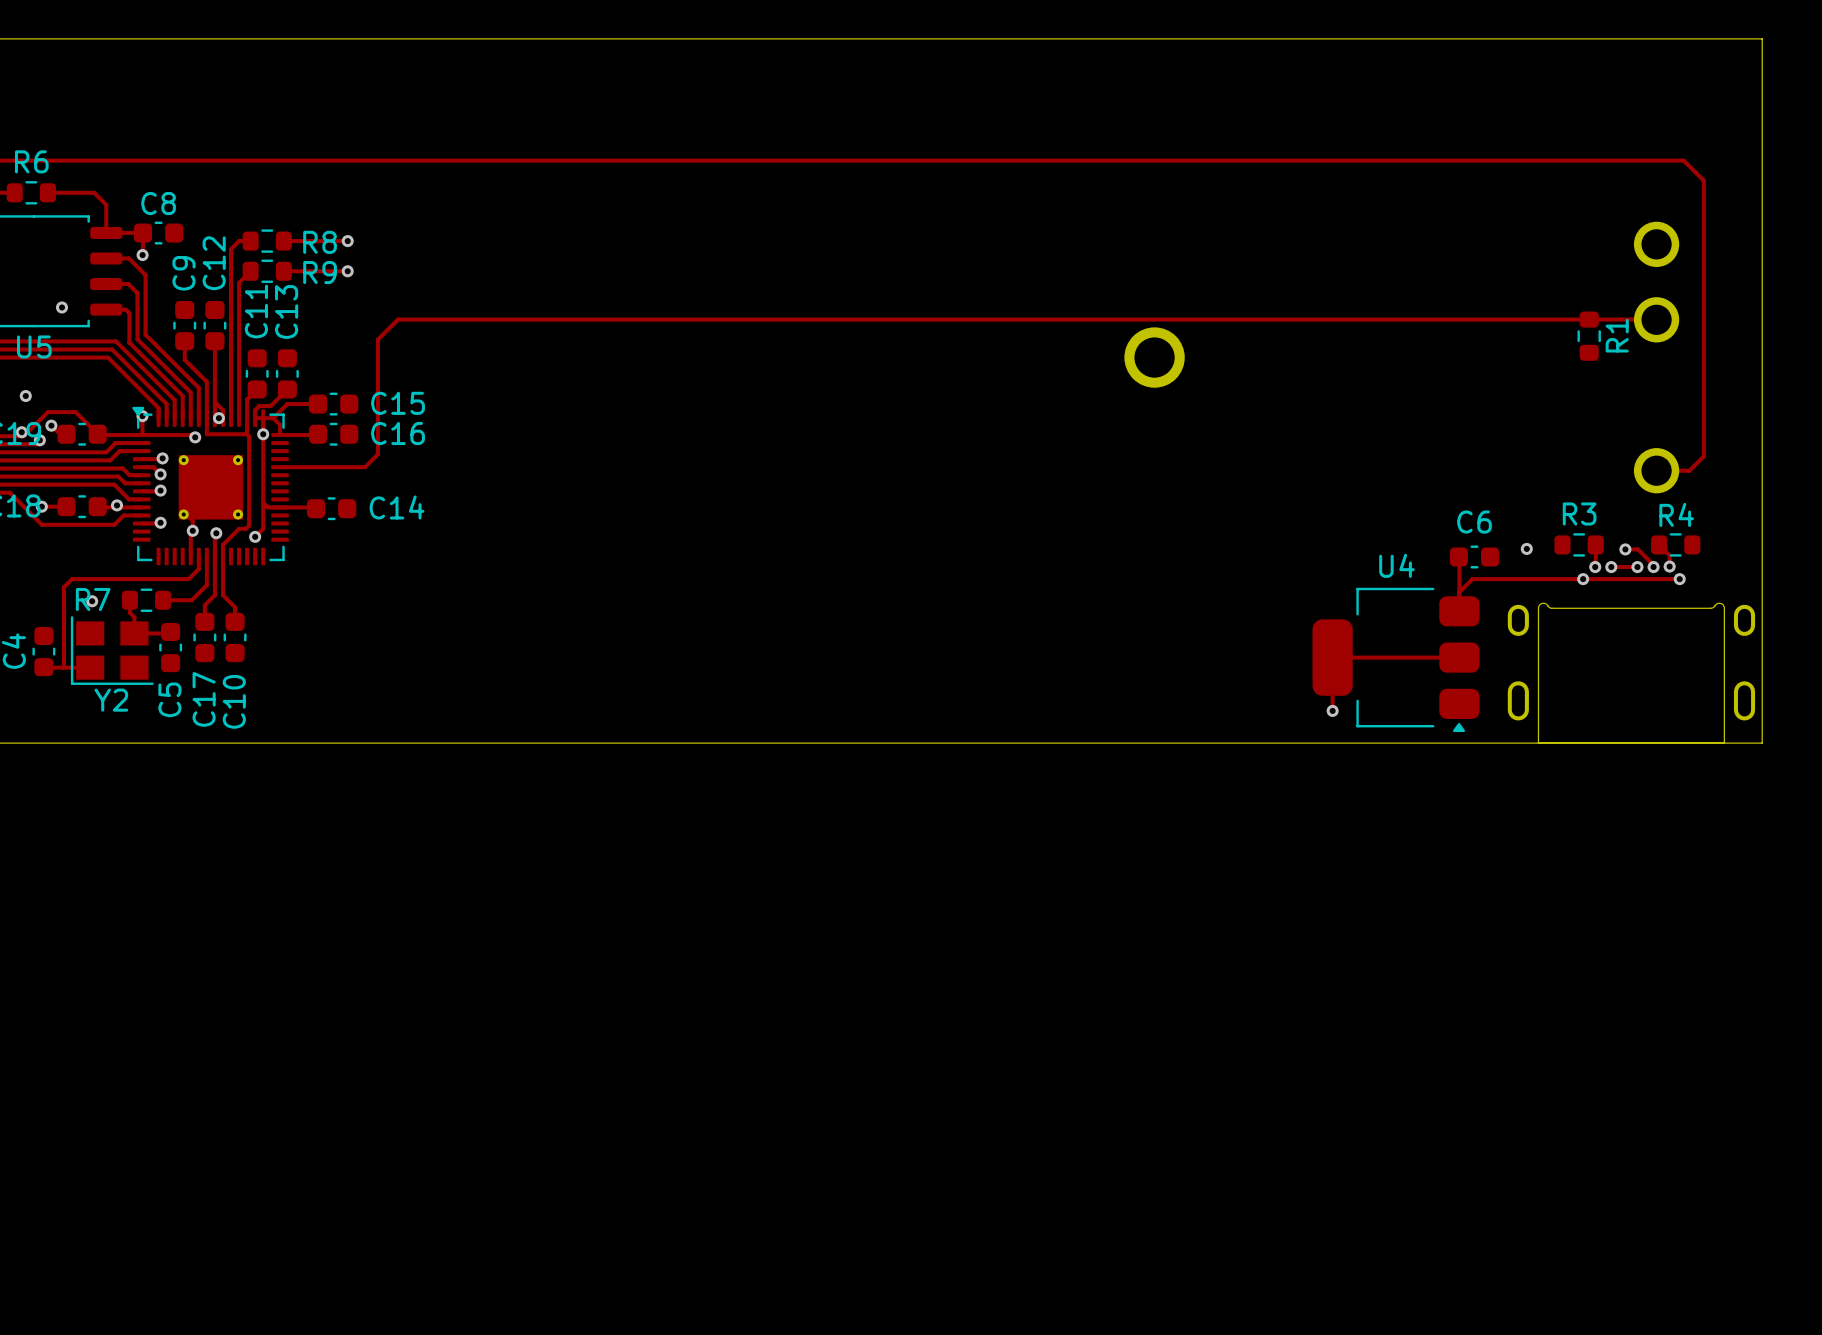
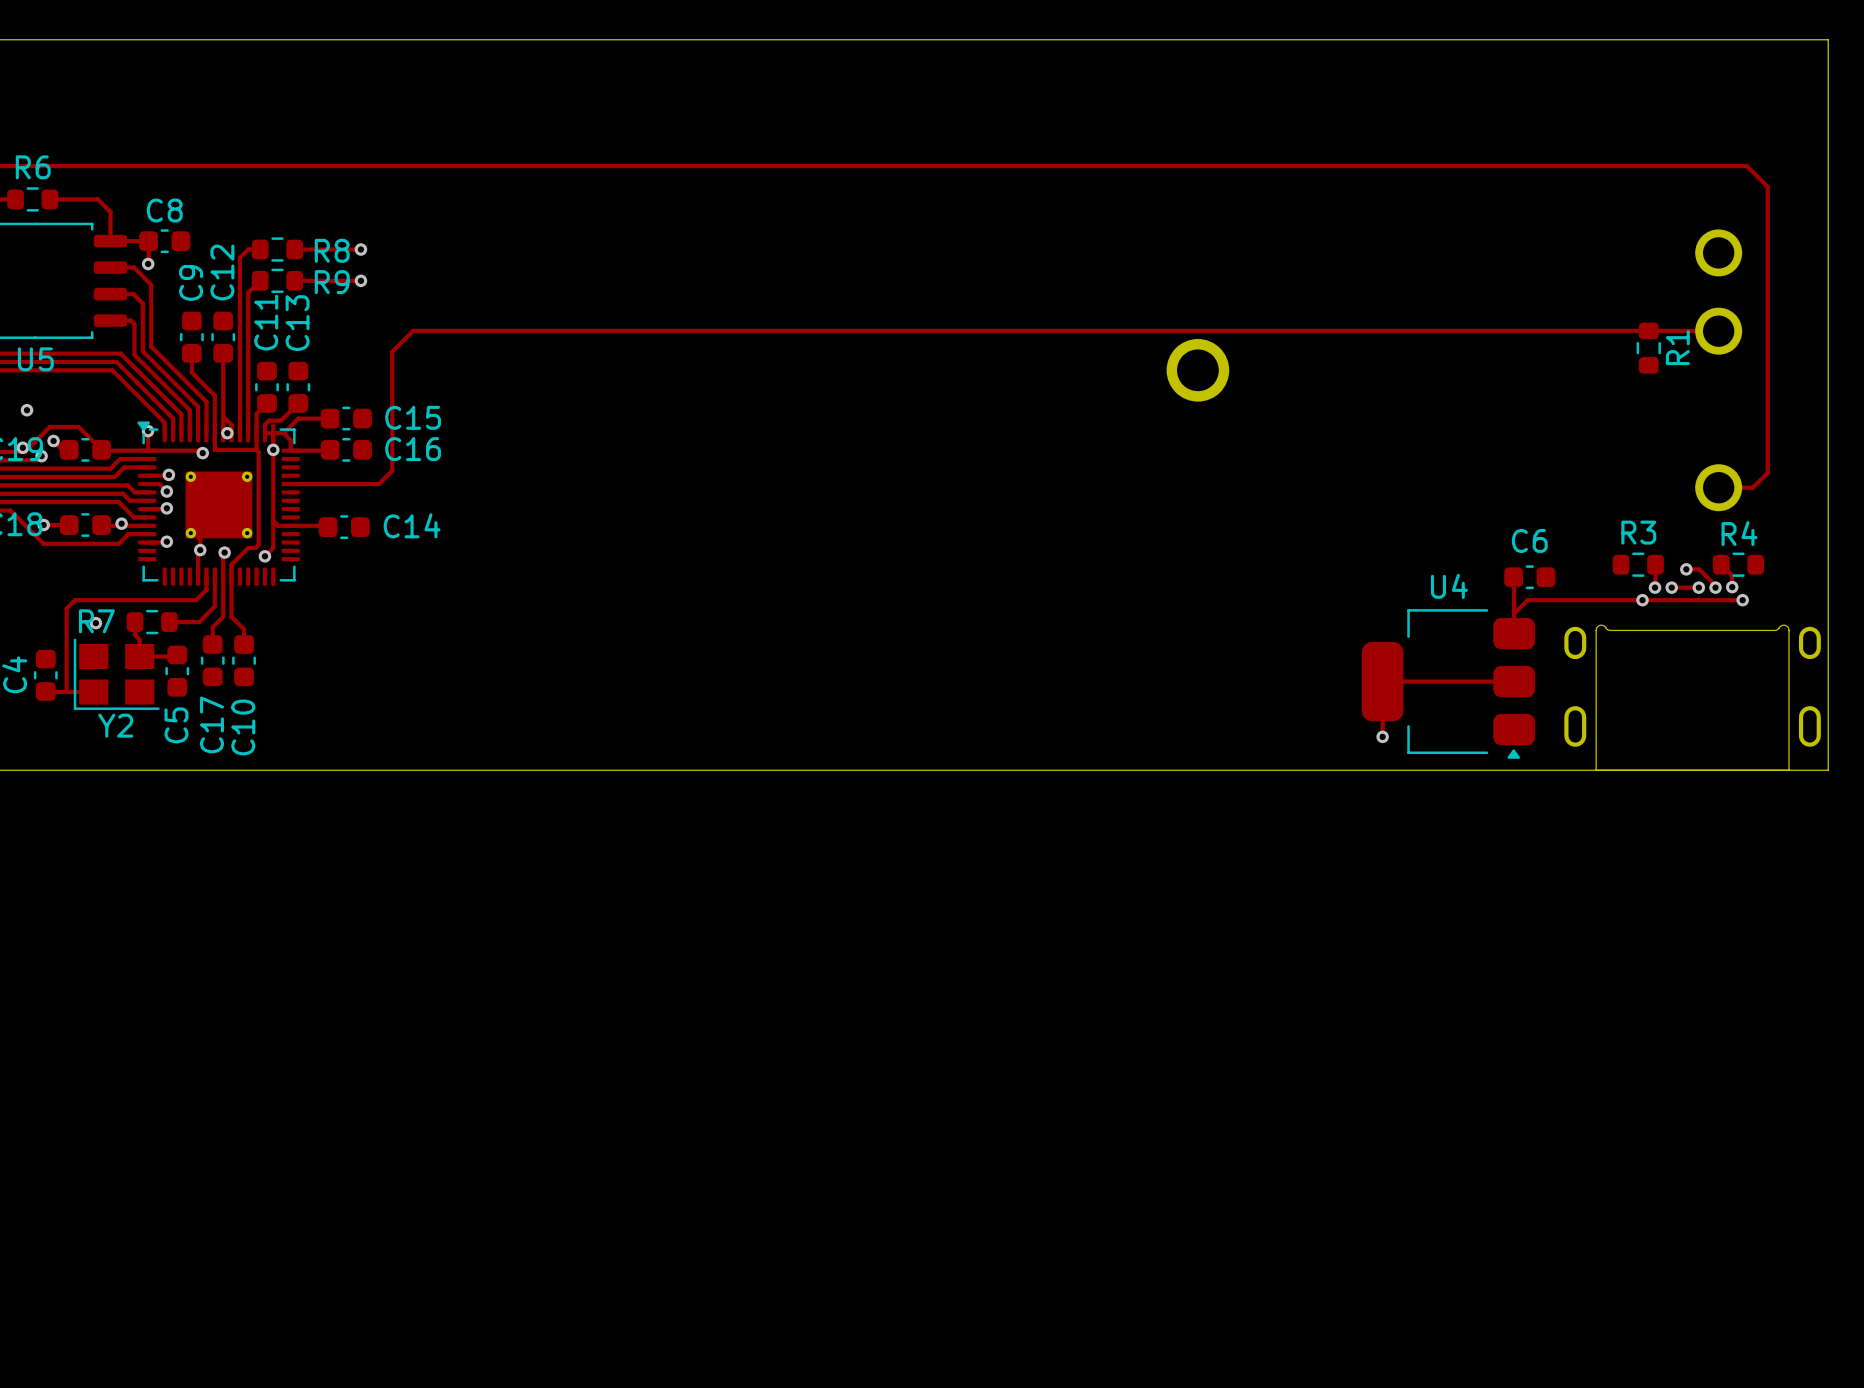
via: (62, 307) -> none
via: (1526, 548) -> none

